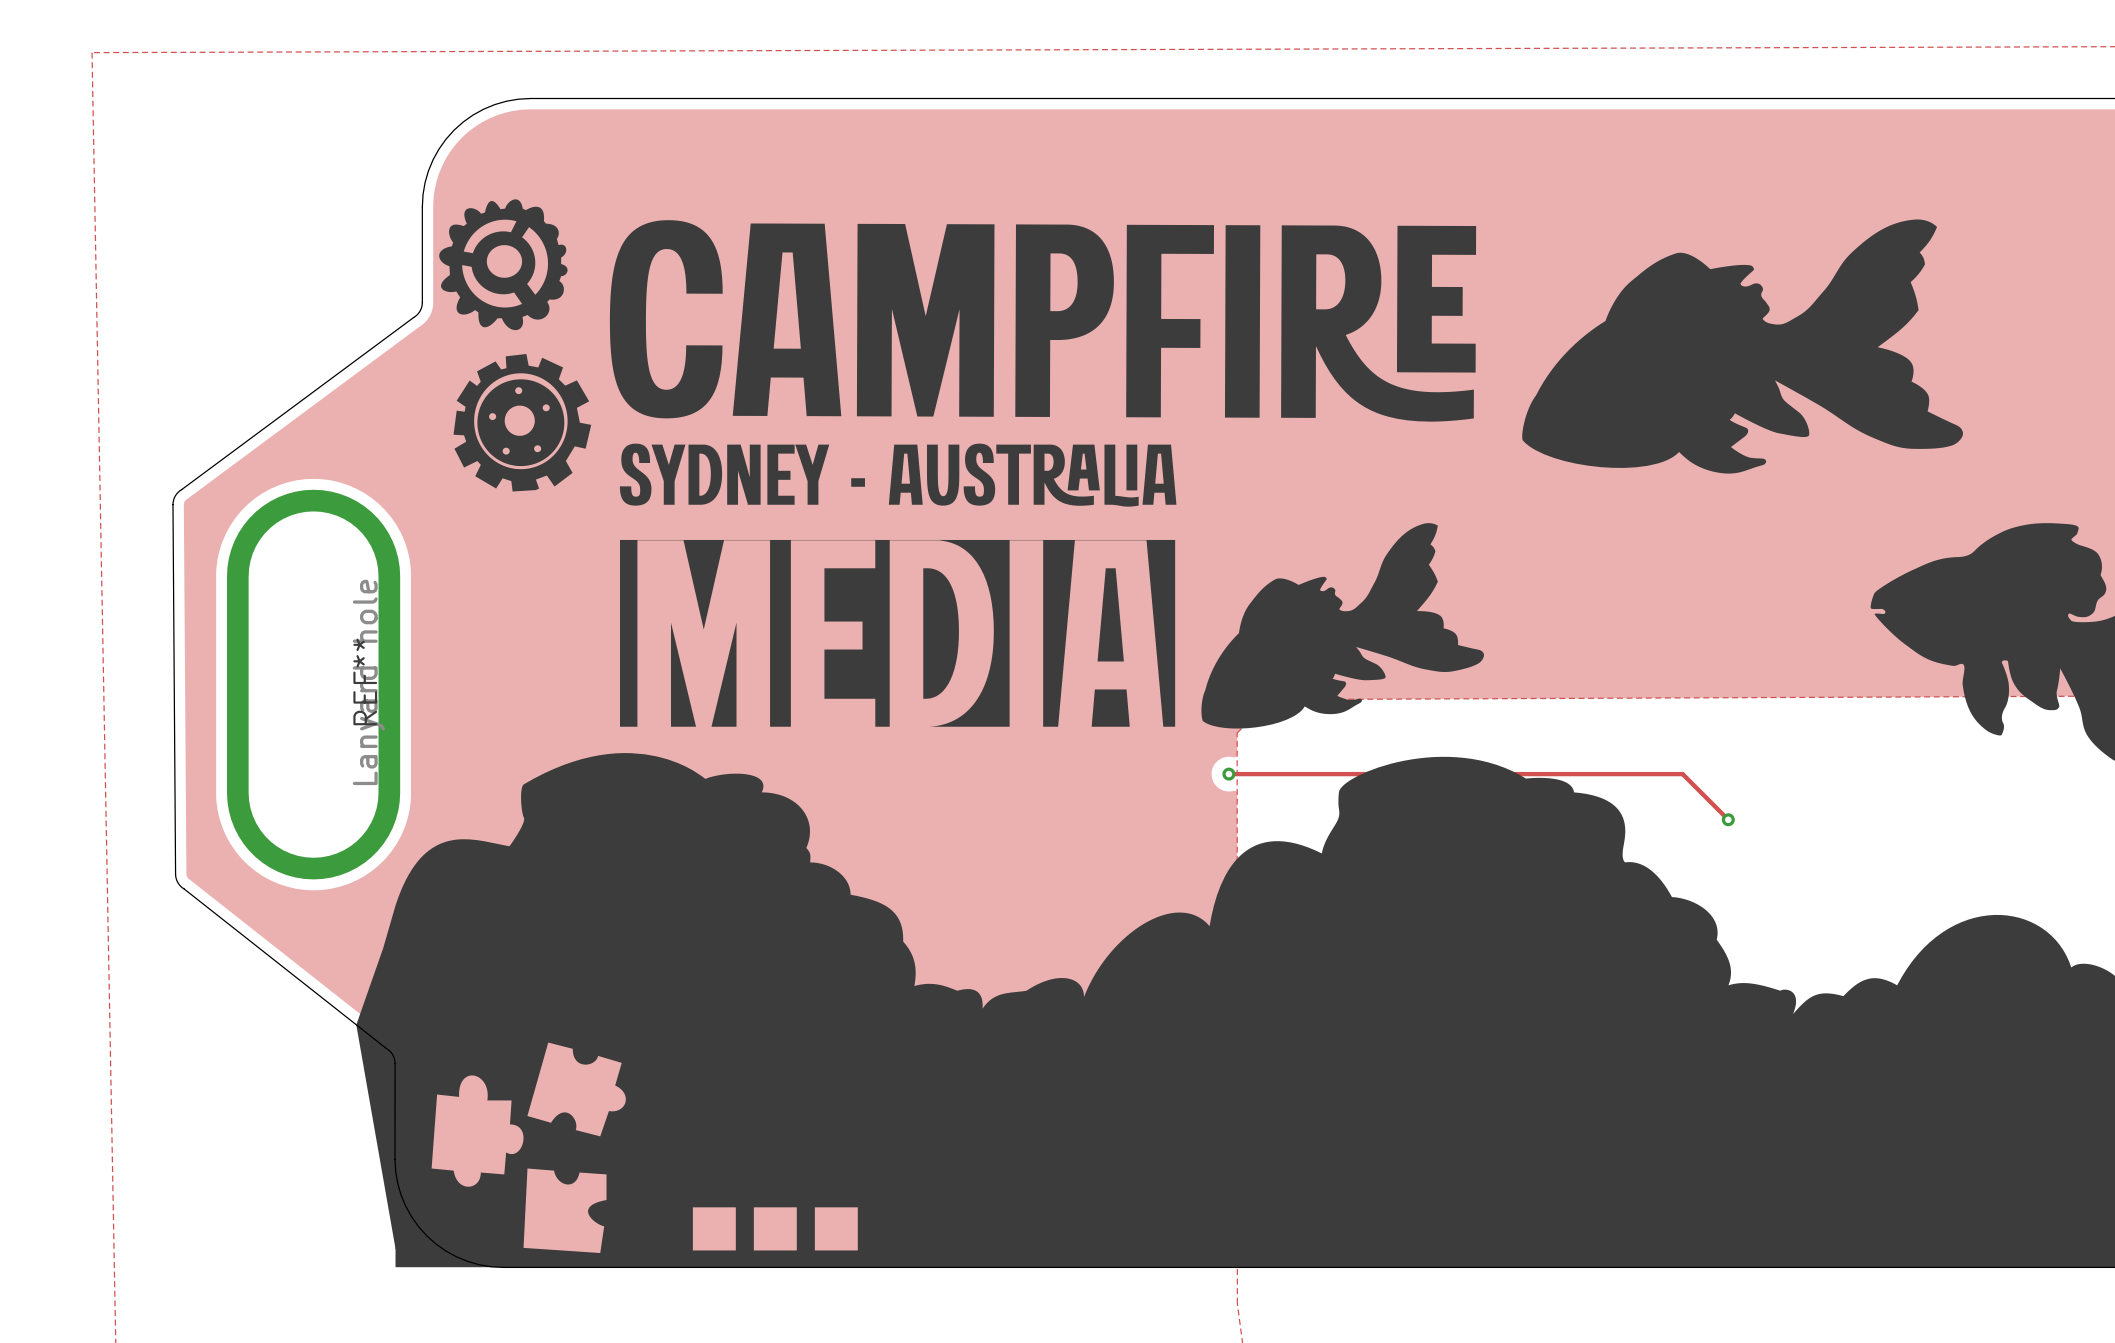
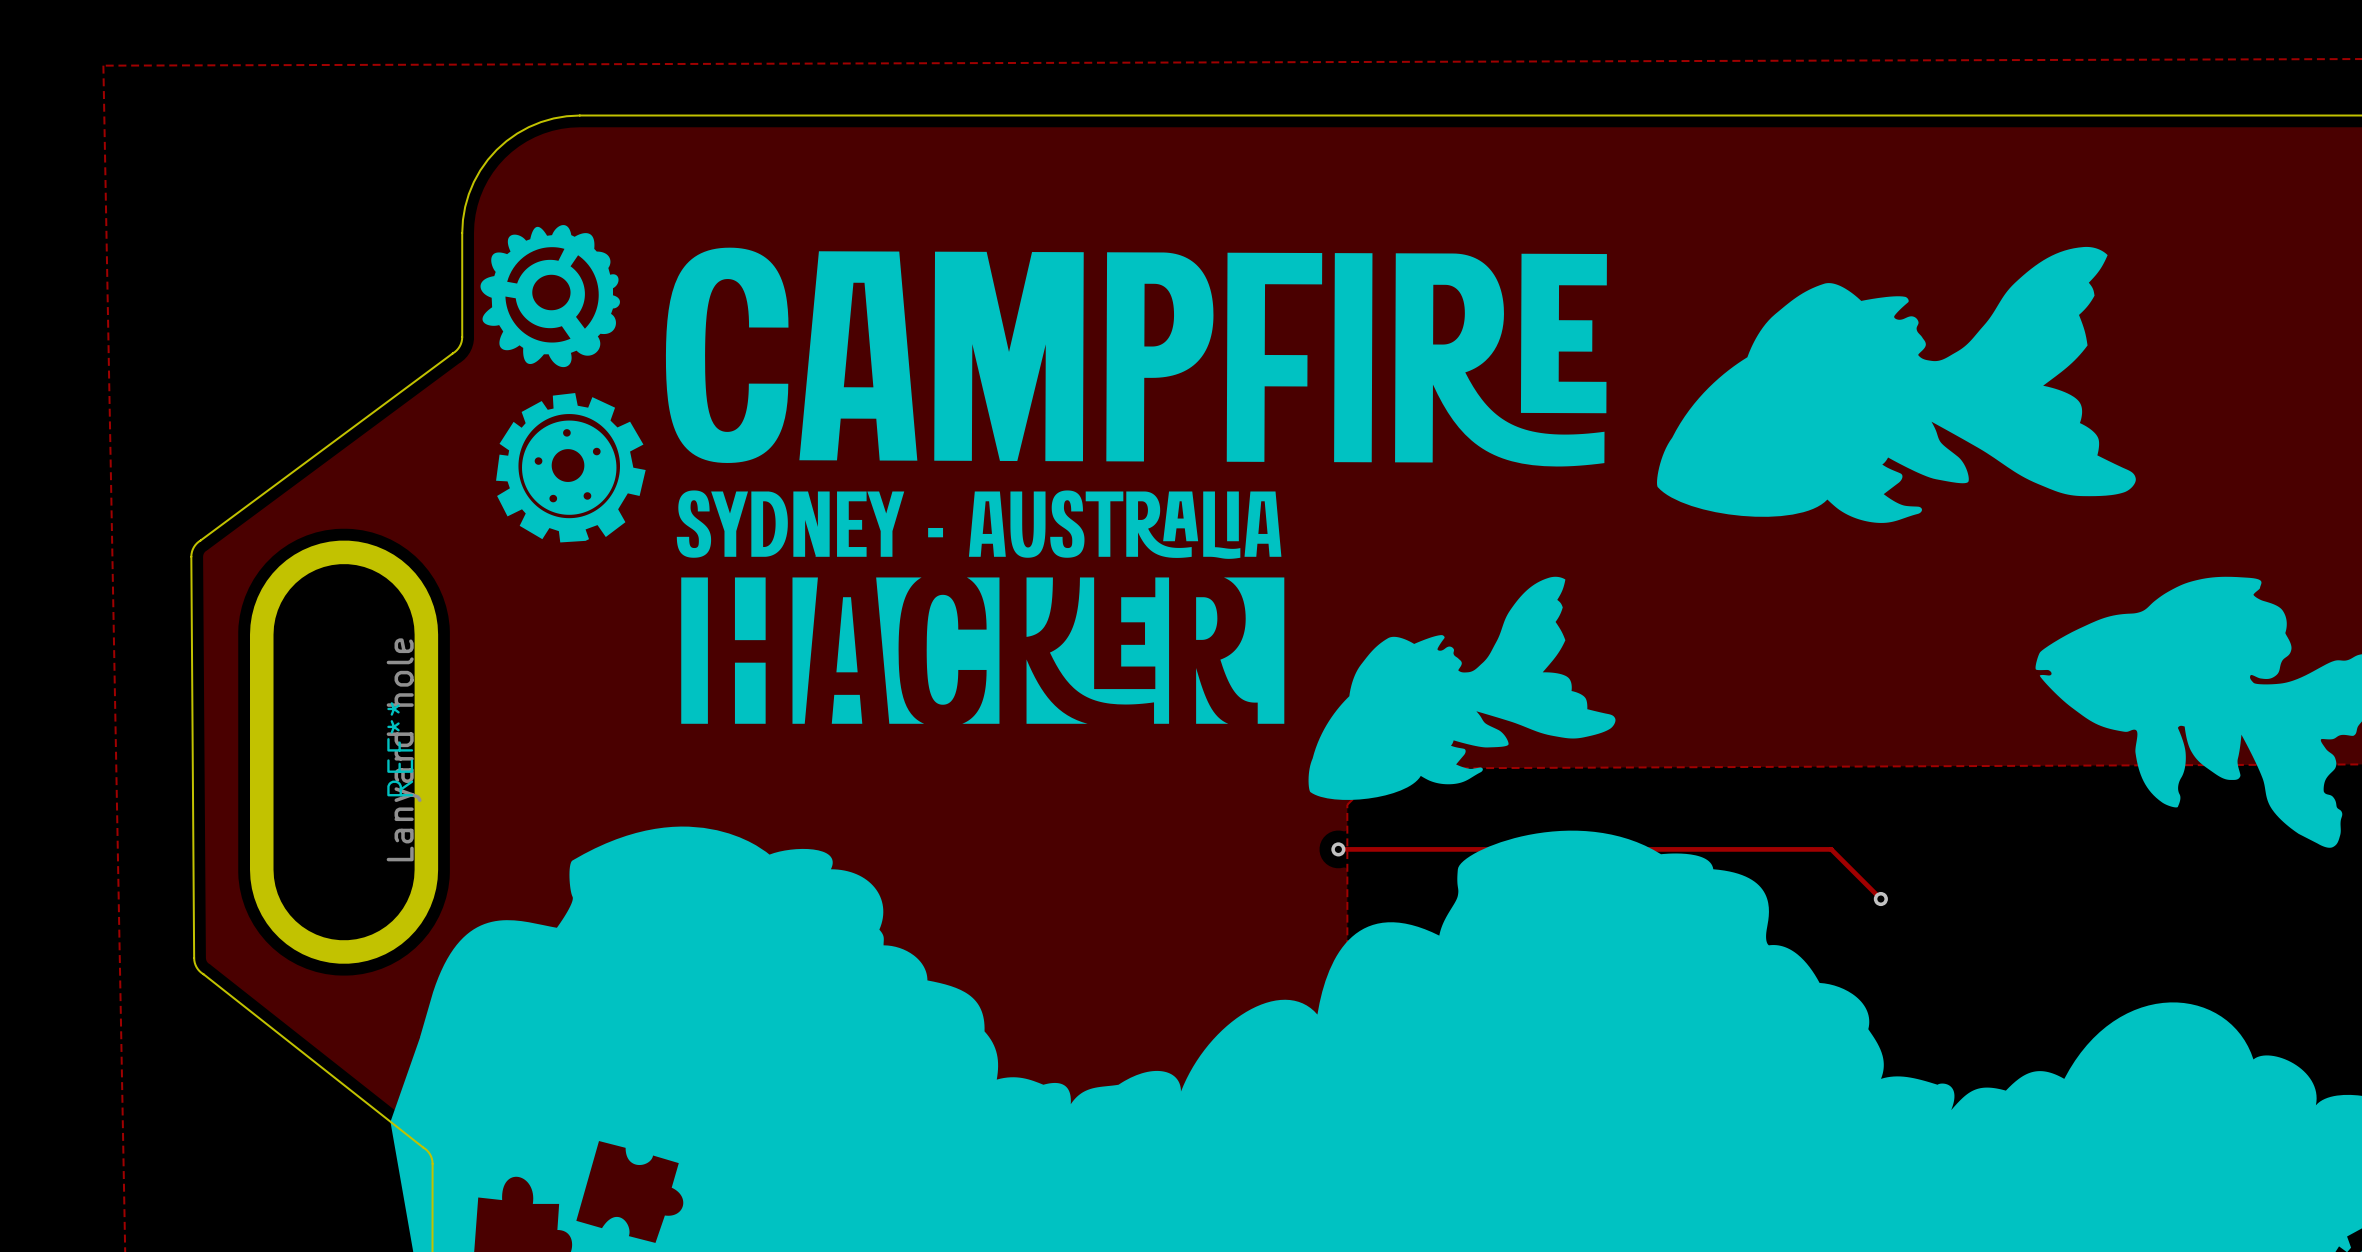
drawing: none -> [681, 577, 1285, 724]
drawing: [620, 539, 1176, 727] -> none
drawing shape: [1097, 568, 1124, 662] -> [1196, 668, 1229, 724]

